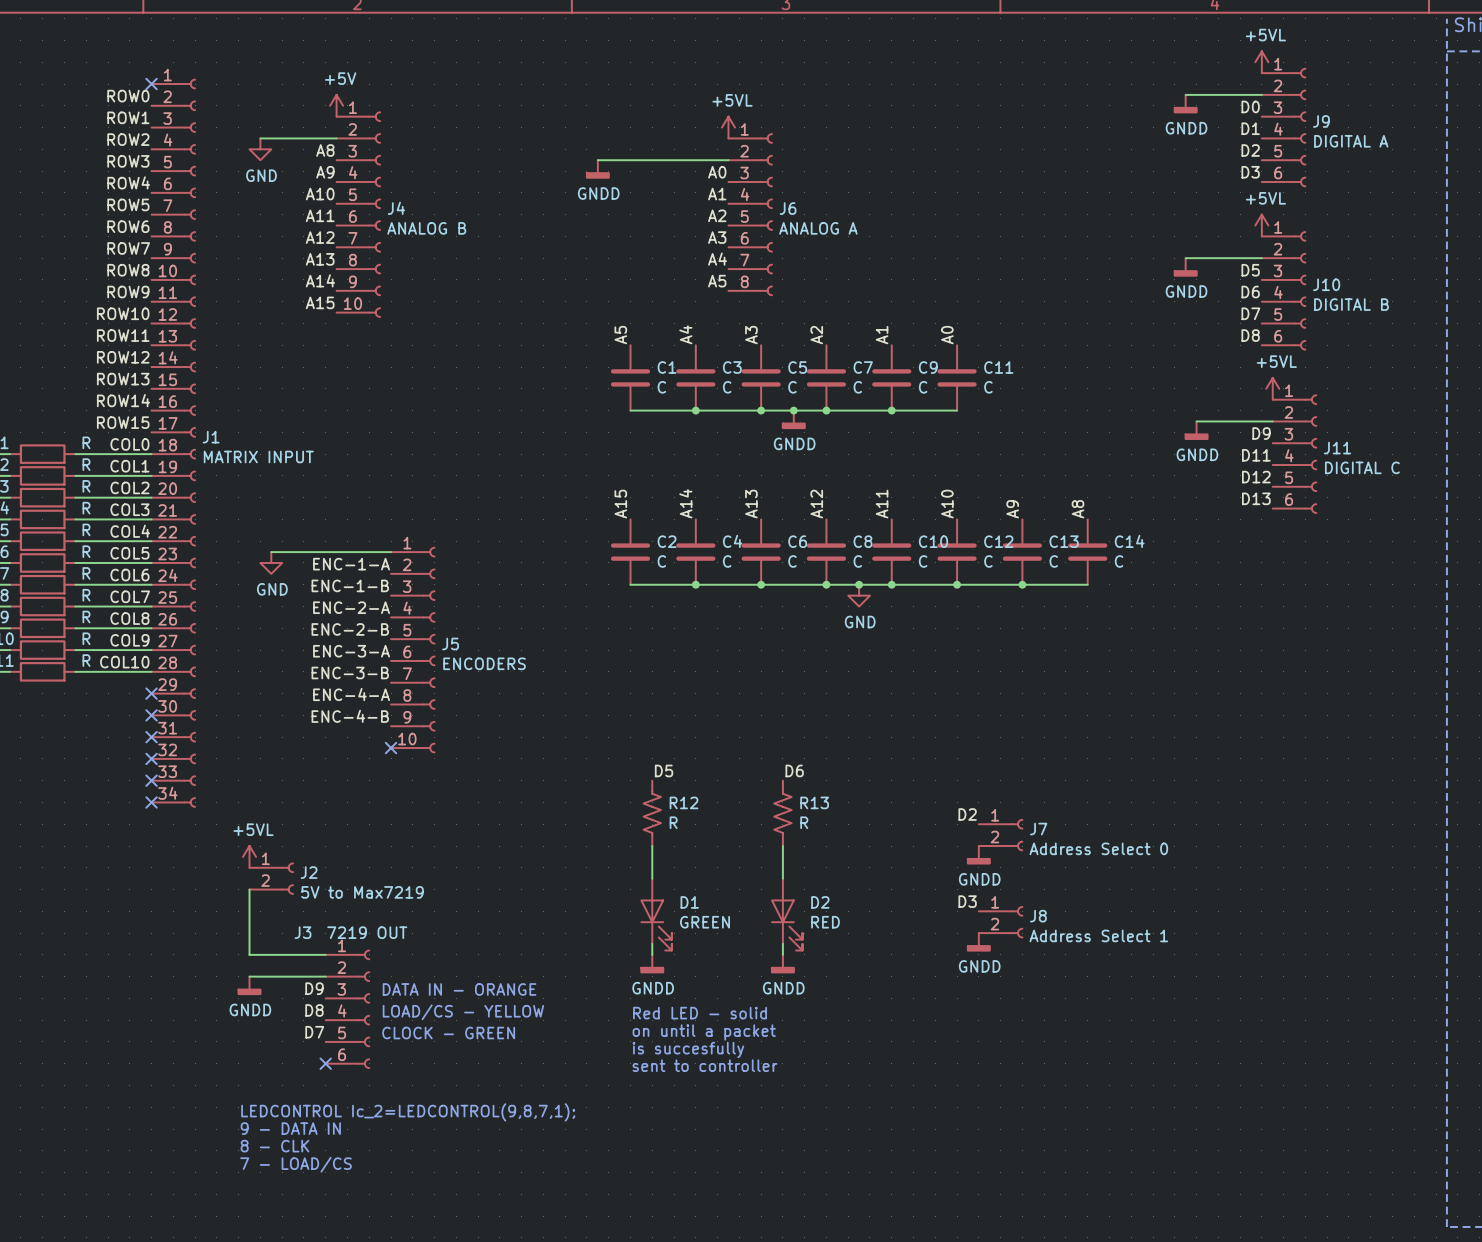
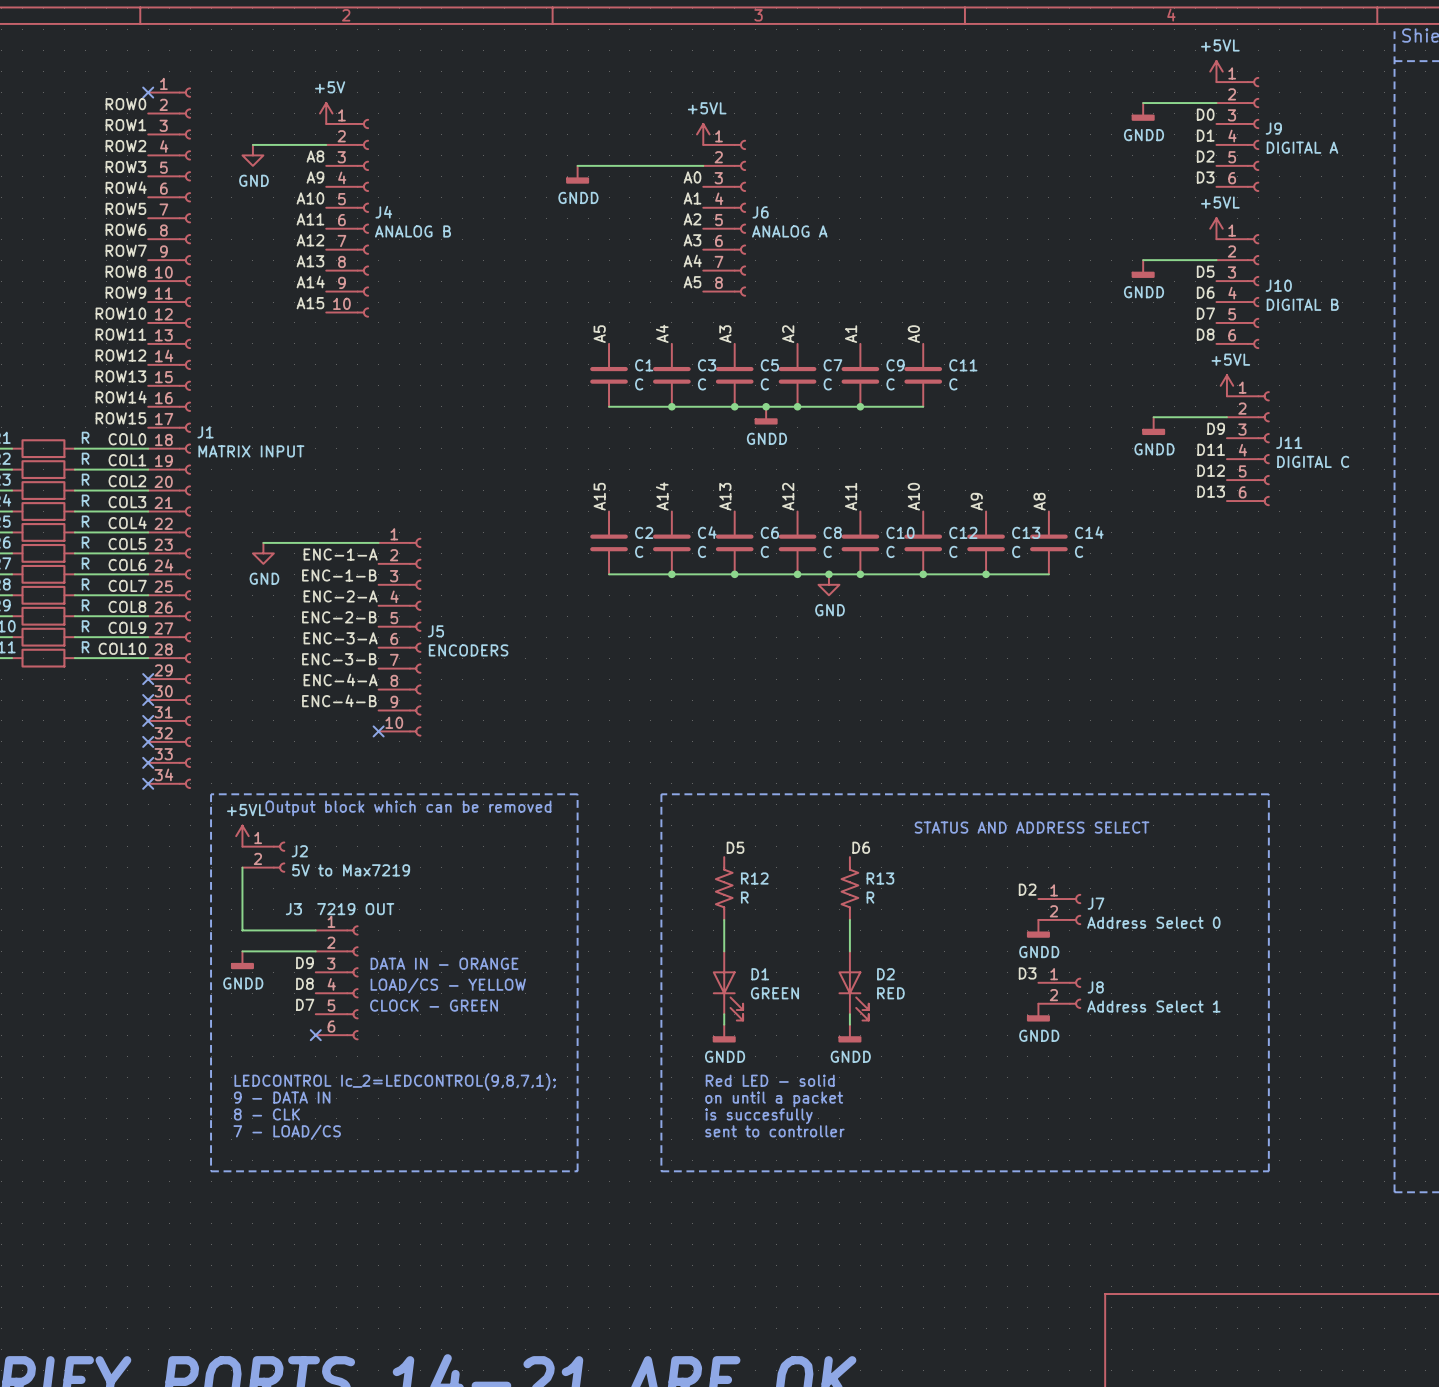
label position: D5 (664, 770) -> D5 (735, 847)
label position: D6 (794, 770) -> D6 (861, 847)
line: none -> (211, 794) (211, 1171) (577, 1171) (577, 794) (211, 794)
R12 position: (652, 813) -> (724, 888)
line: none -> (661, 794) (1268, 794) (1268, 1171) (661, 1171) (661, 794)
R13 position: (782, 813) -> (849, 888)
label position: D2 (967, 814) -> D2 (1027, 889)
text: none -> Output block which can be removed (408, 808)
J7 position: (1000, 835) -> (1059, 909)
wire: (652, 846) (652, 878) -> (724, 919) (724, 951)
wire: (782, 846) (782, 878) -> (849, 919) (849, 951)
text: none -> STATUS AND ADDRESS SELECT (1032, 827)
power symbol: GNDD (978, 855) -> none
label position: D3 (967, 901) -> D3 (1027, 973)
D1 position: (656, 914) -> (728, 985)
D2 position: (786, 914) -> (853, 985)
J8 position: (1000, 922) -> (1059, 993)
power symbol: GNDD (978, 942) -> none
wire: (652, 943) (652, 954) -> (724, 1014) (724, 1024)
wire: (782, 943) (782, 954) -> (849, 1014) (849, 1024)
power symbol: none -> GNDD (1038, 928)
power symbol: GNDD (652, 964) -> none
power symbol: GNDD (782, 964) -> none
text position: Red LED - solid (700, 1013) -> Red LED - solid (770, 1080)
text position: on until a packet (704, 1032) -> on until a packet (774, 1099)
power symbol: none -> GNDD (1038, 1012)
text position: is succesfully (688, 1049) -> is succesfully (758, 1116)
power symbol: none -> GNDD (724, 1033)
power symbol: none -> GNDD (849, 1033)
text position: sent to controller (704, 1065) -> sent to controller (774, 1131)

